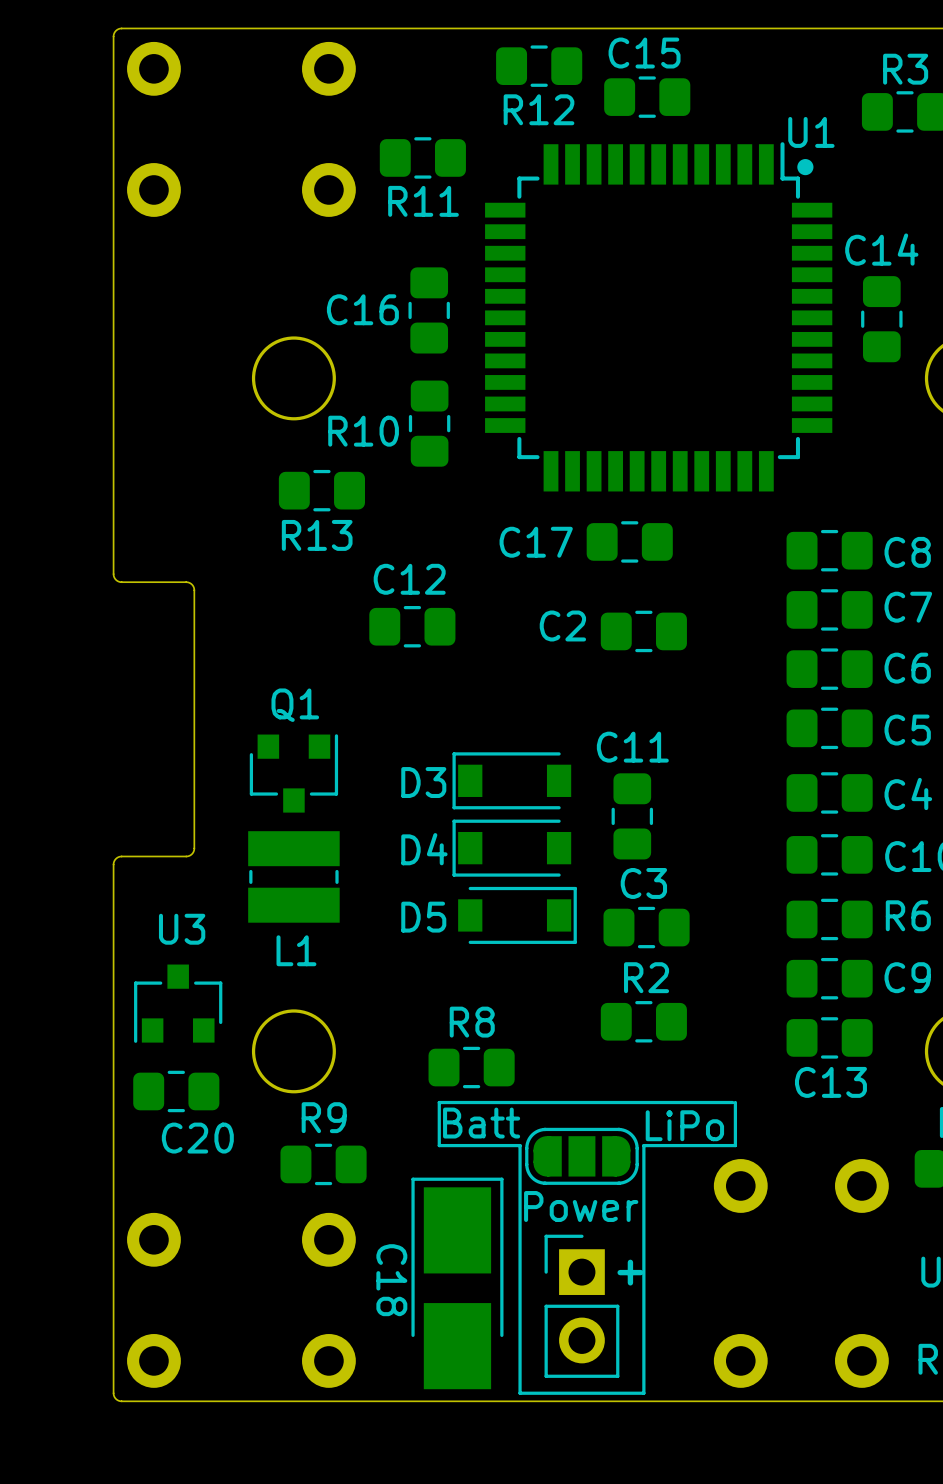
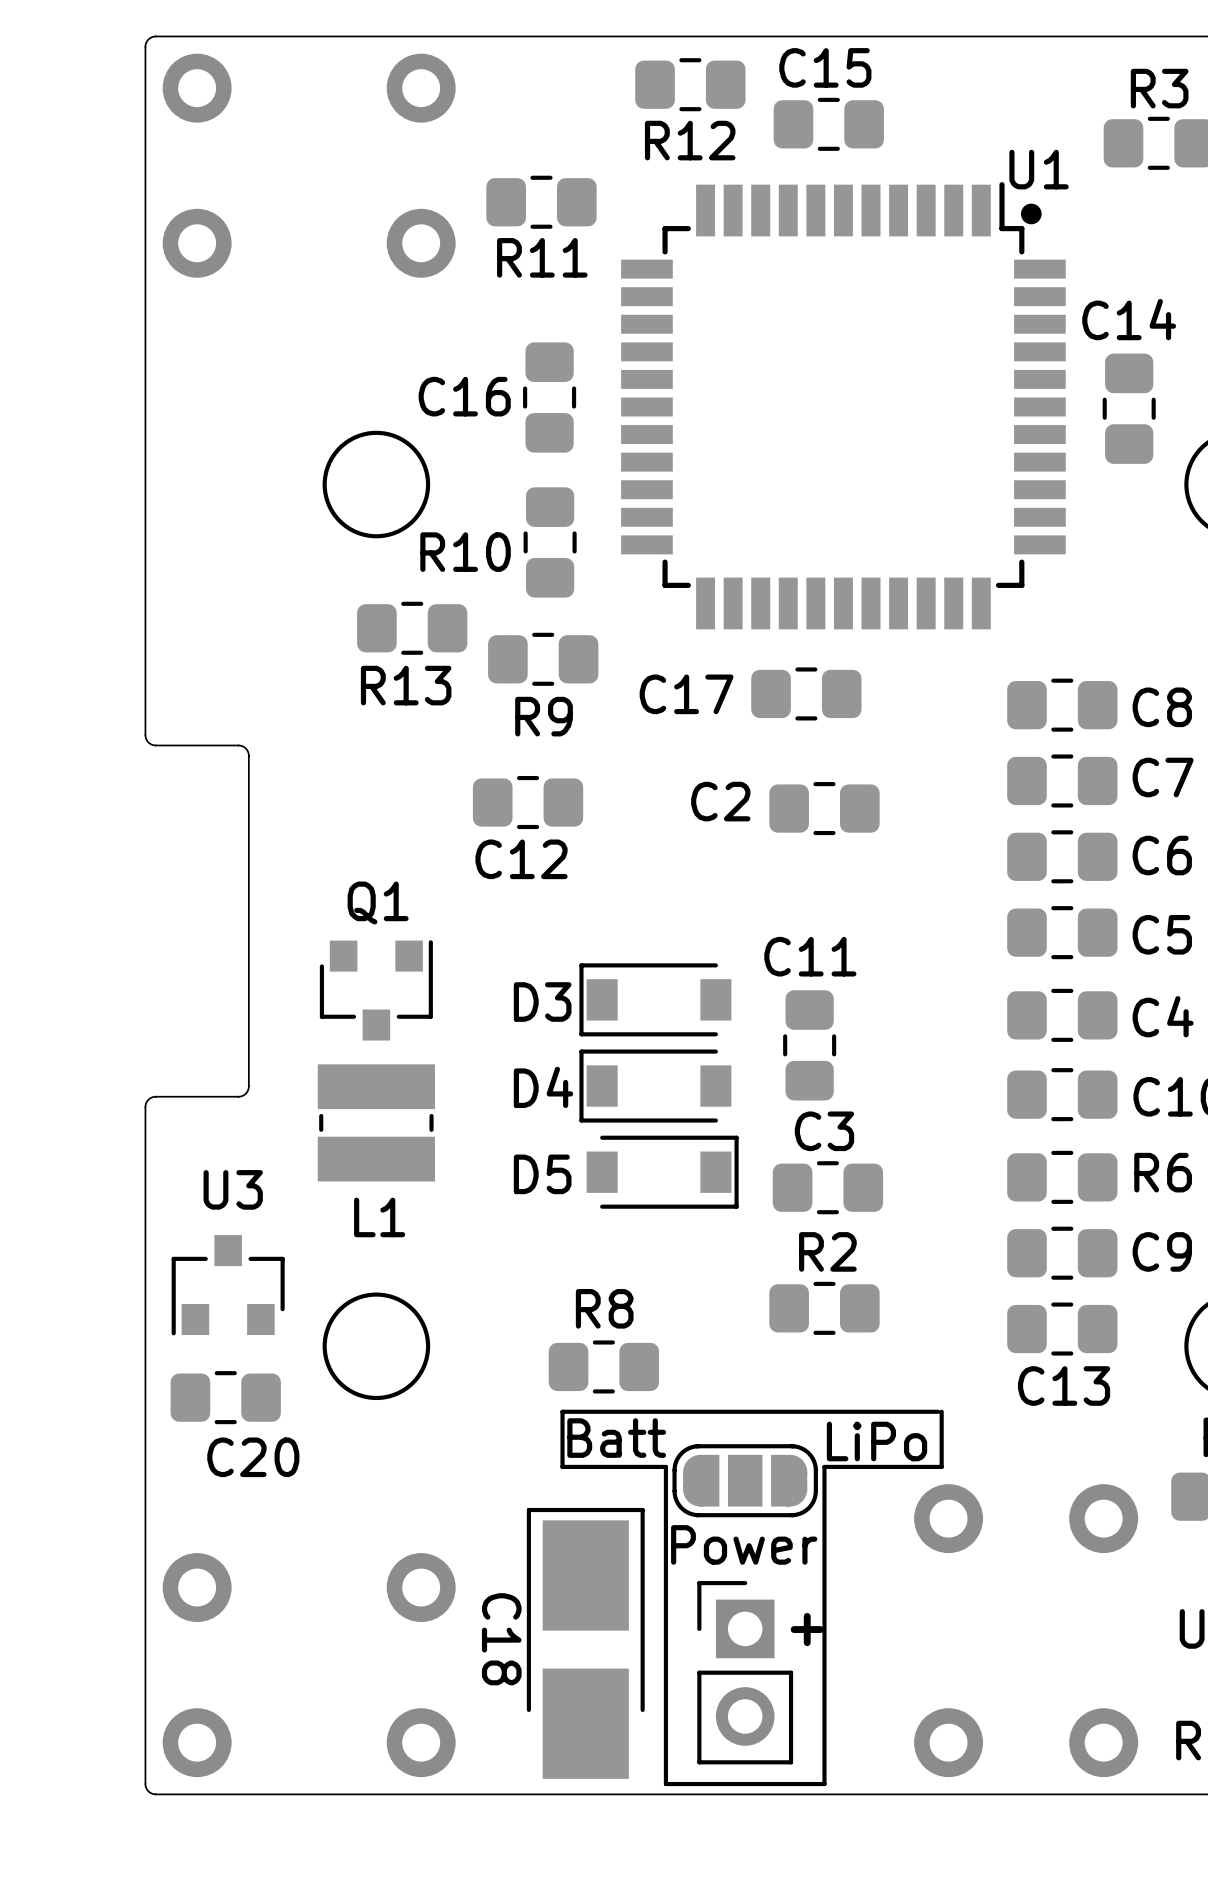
C12 name position: C12 (409, 579) -> C12 (521, 859)
R9 name position: R9 (324, 1117) -> R9 (544, 716)
R9 position: (323, 1164) -> (543, 659)

